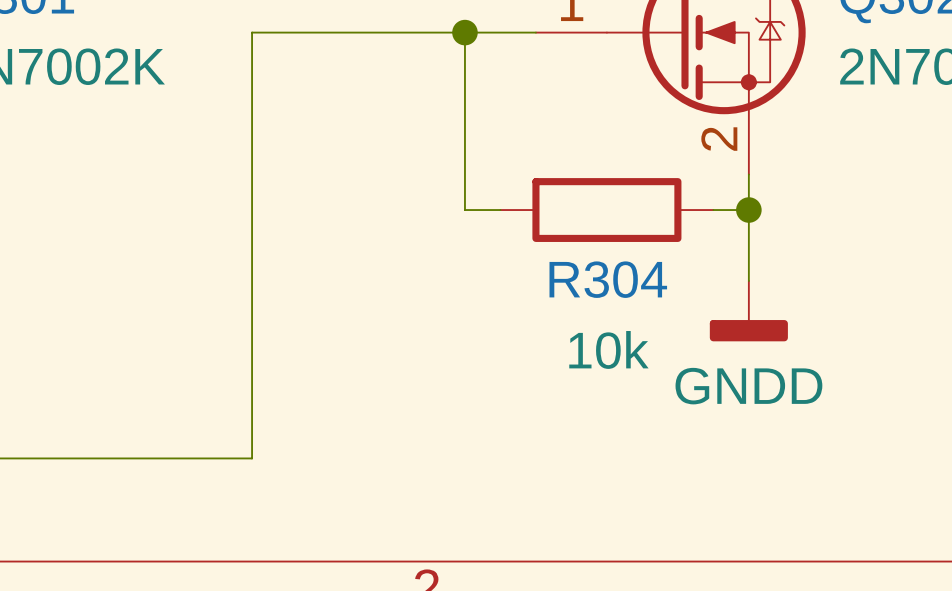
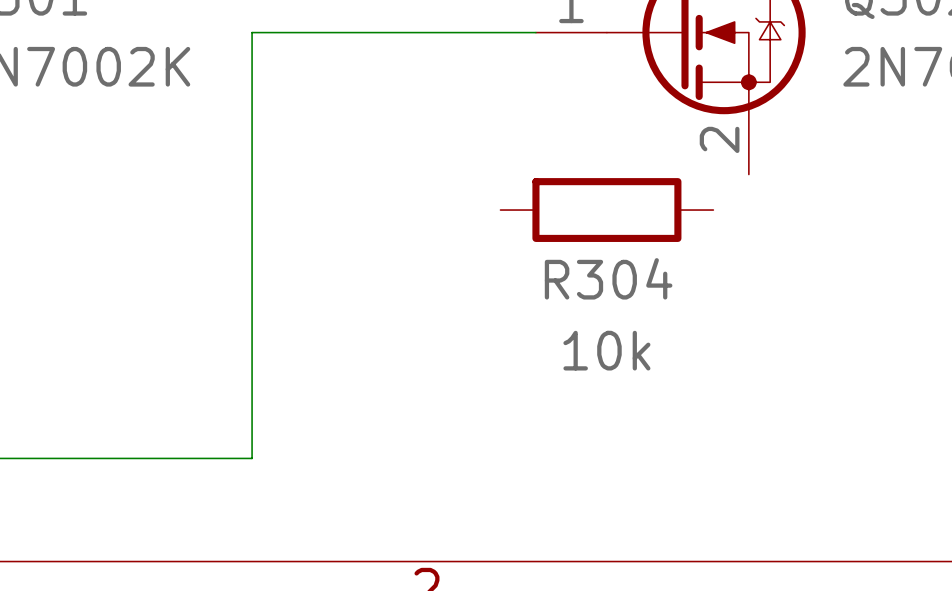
wire: (464, 32) (464, 210) (500, 210) -> none
junction: (464, 32) -> none
wire: (748, 174) (748, 281) -> none
wire: (713, 210) (748, 210) -> none
junction: (748, 210) -> none
power symbol: GNDD (748, 311) -> none

